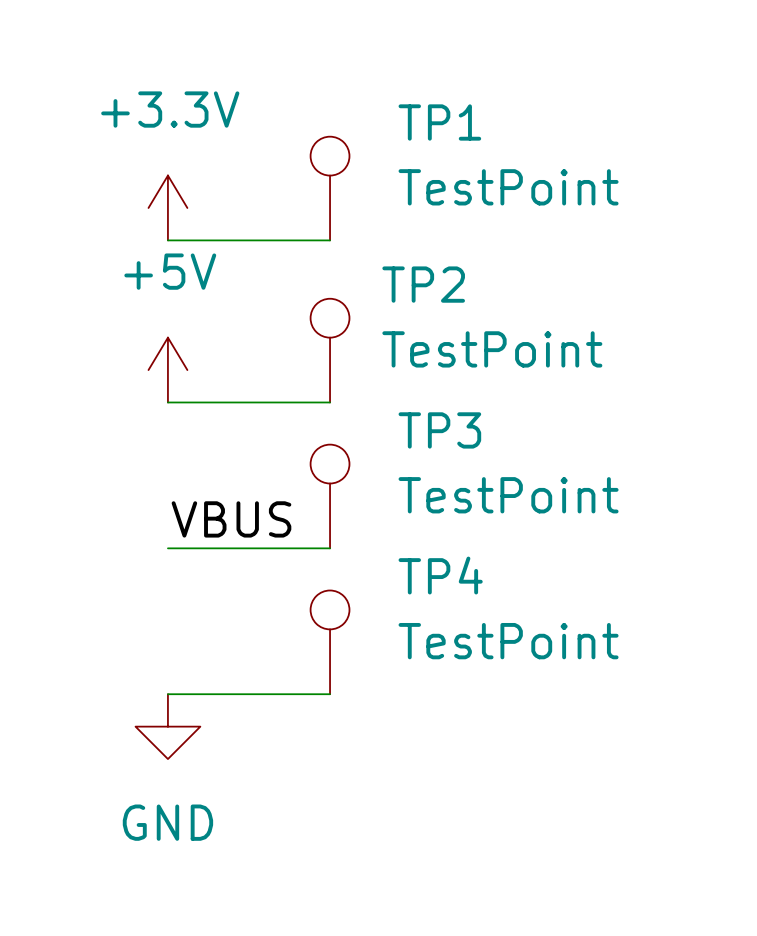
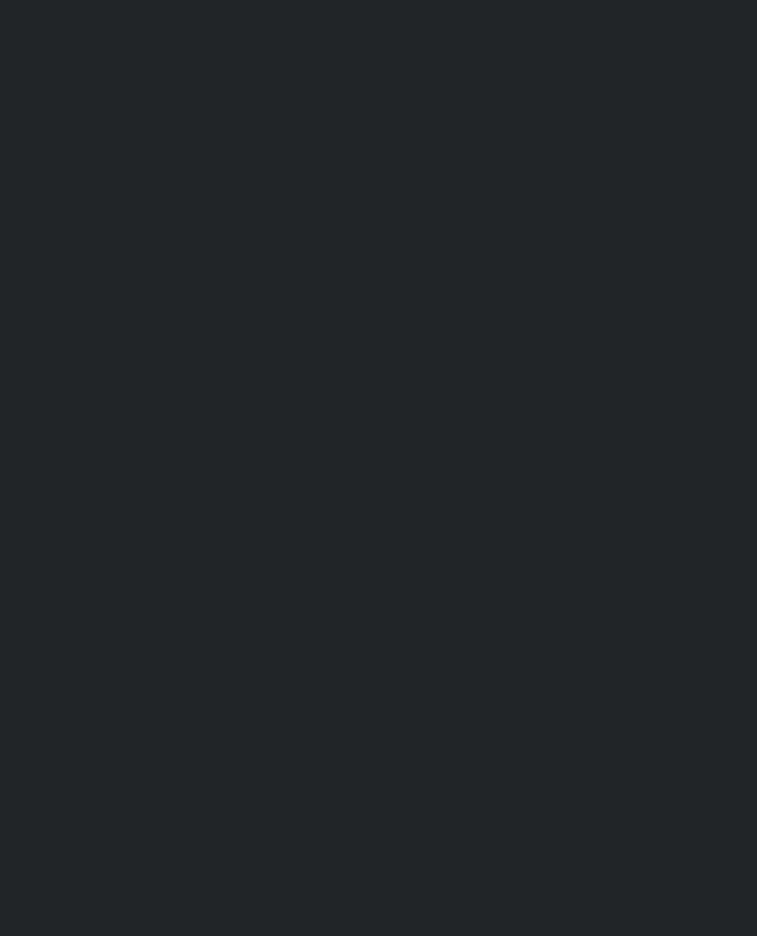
TP1: TestPoint (330, 188) -> none
power symbol: +3.3V (167, 207) -> none
wire: (167, 240) (330, 240) -> none
TP2: TestPoint (330, 350) -> none
power symbol: +5V (167, 370) -> none
wire: (167, 402) (330, 402) -> none
TP3: TestPoint (330, 496) -> none
label: VBUS (231, 519) -> none
wire: (167, 548) (330, 548) -> none
TP4: TestPoint (330, 642) -> none
wire: (167, 694) (330, 694) -> none
power symbol: GND (167, 726) -> none

